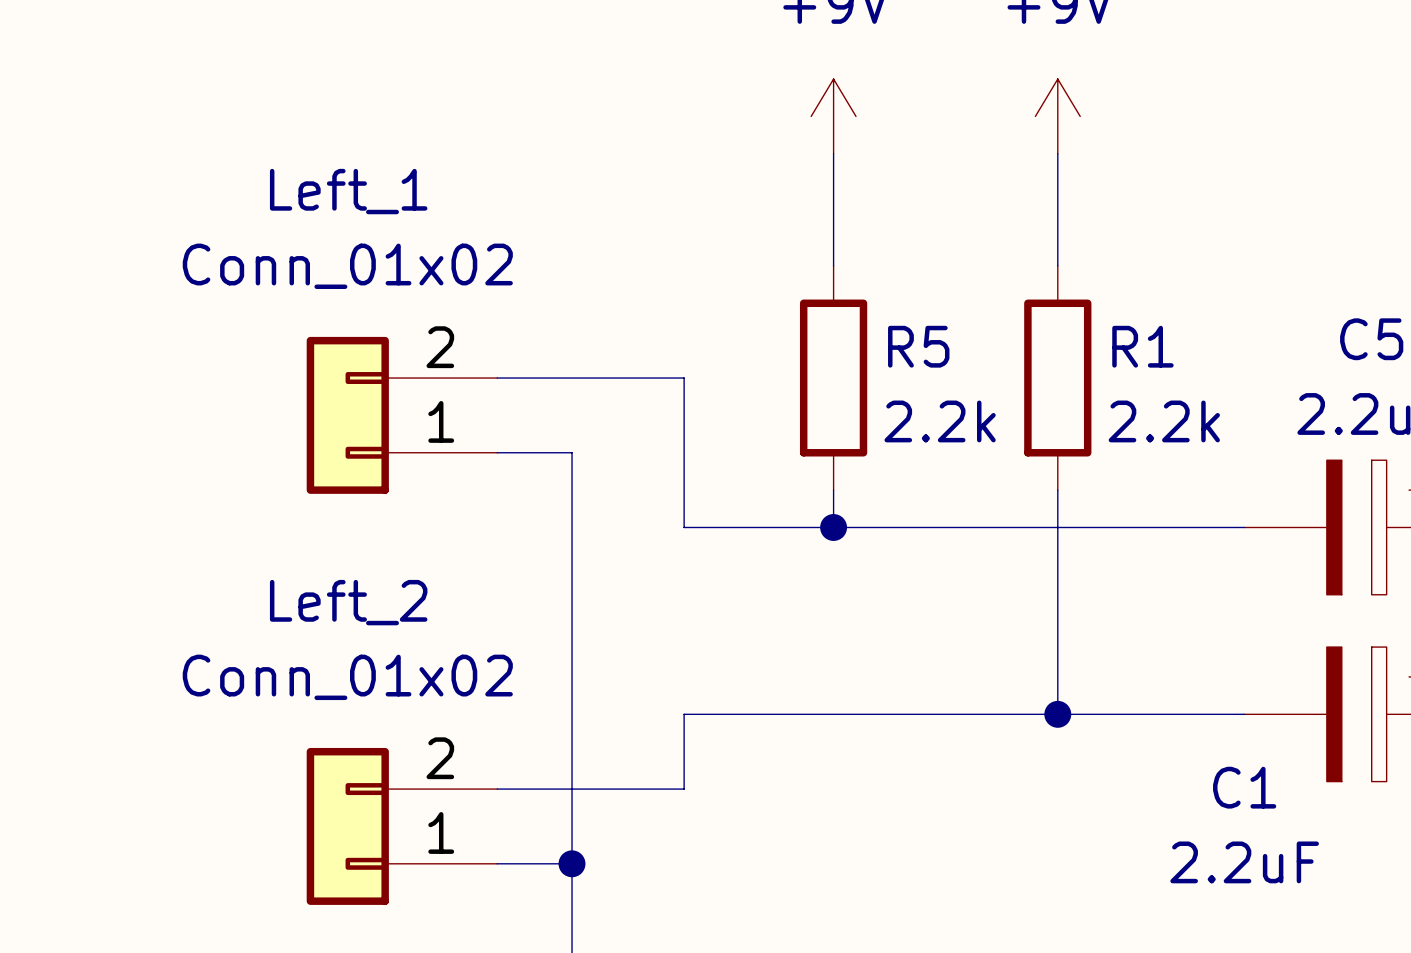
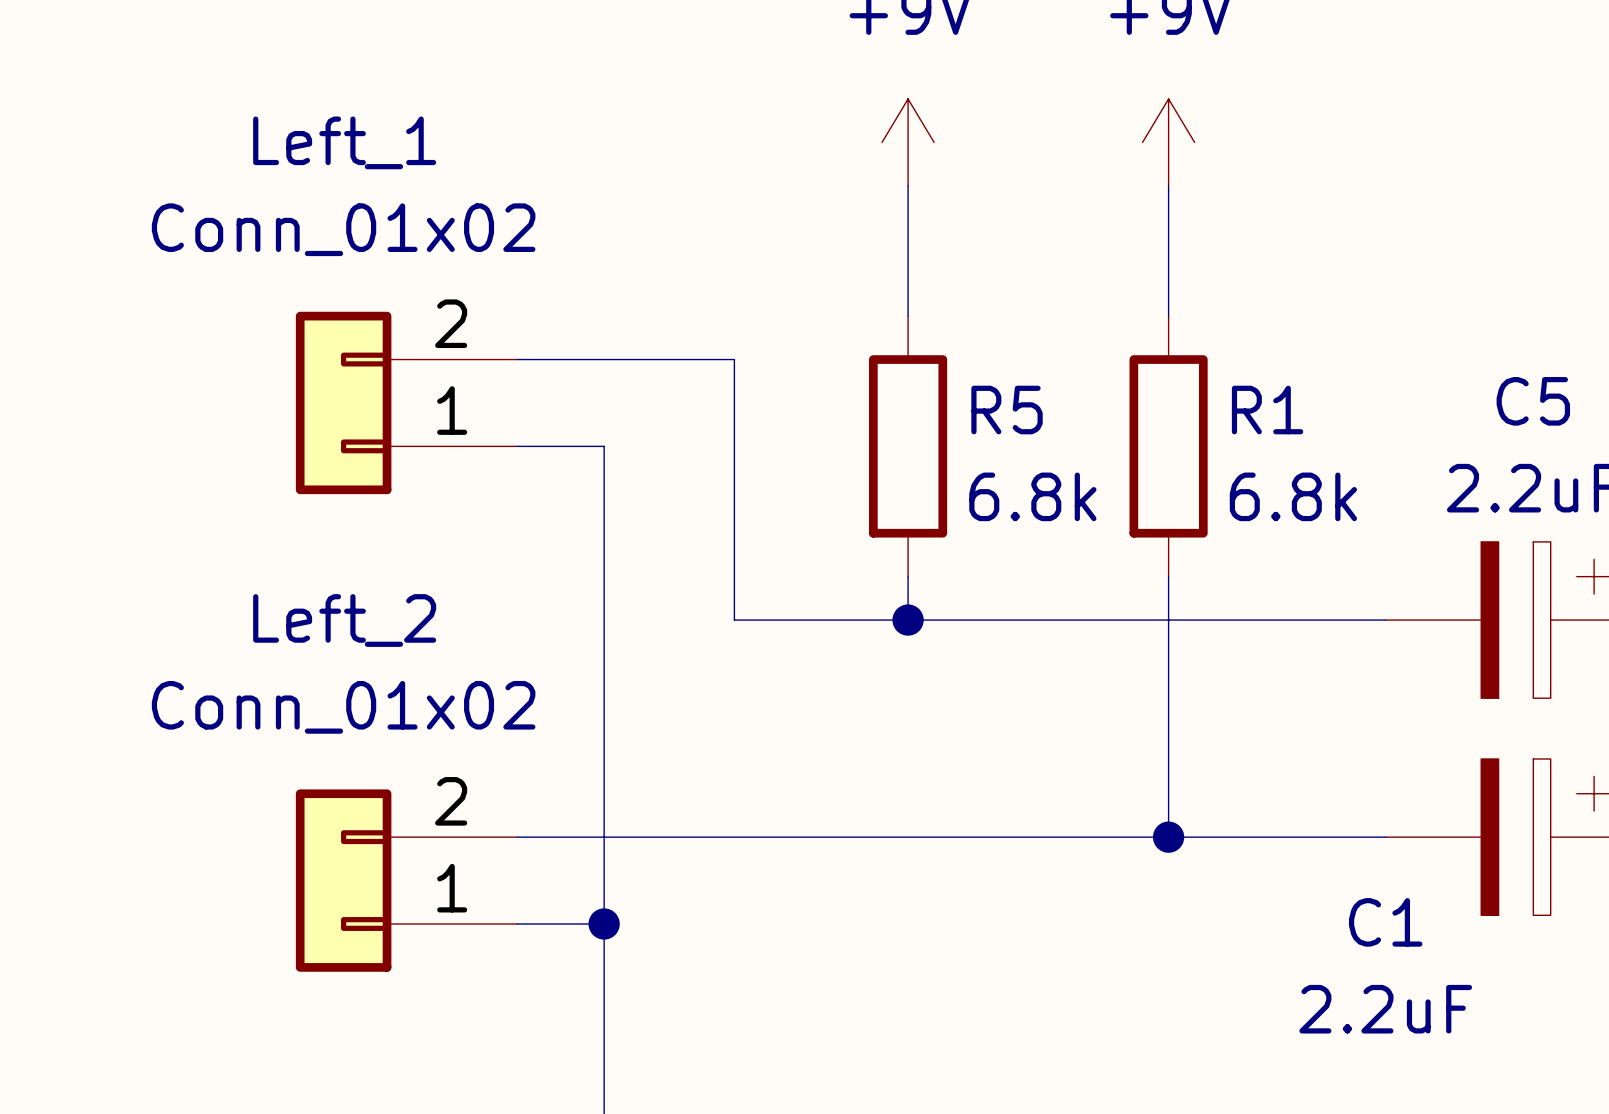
wire: (572, 378) (684, 378) -> (517, 359) (734, 359) (734, 446)
Left_1 position: (401, 415) -> (406, 402)
R5 value: 2.2k (940, 421) -> 6.8k (1032, 496)
R1 value: 2.2k (1164, 421) -> 6.8k (1293, 496)
wire: (497, 452) (572, 452) -> (604, 446) (604, 533)
wire: (684, 714) (684, 789) (572, 789) -> (734, 837) (517, 837)
Left_2 position: (401, 826) -> (406, 880)
wire: (497, 863) (572, 863) -> none
junction position: (572, 863) -> (604, 923)

